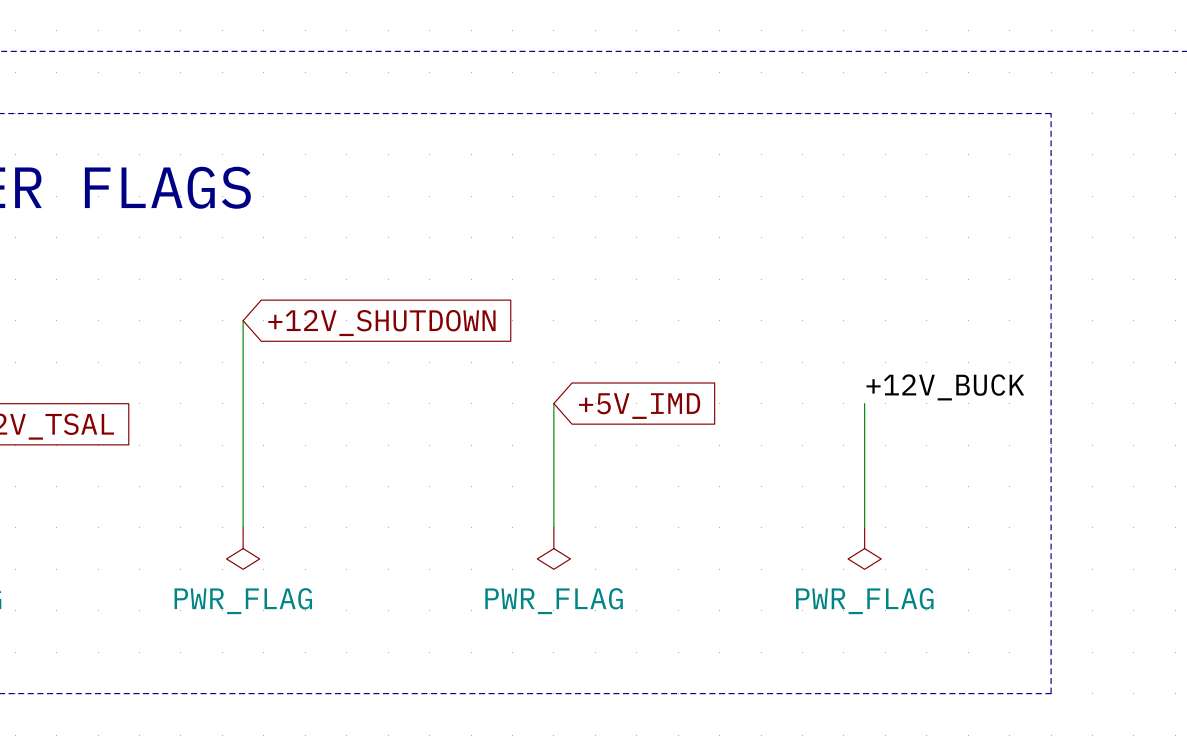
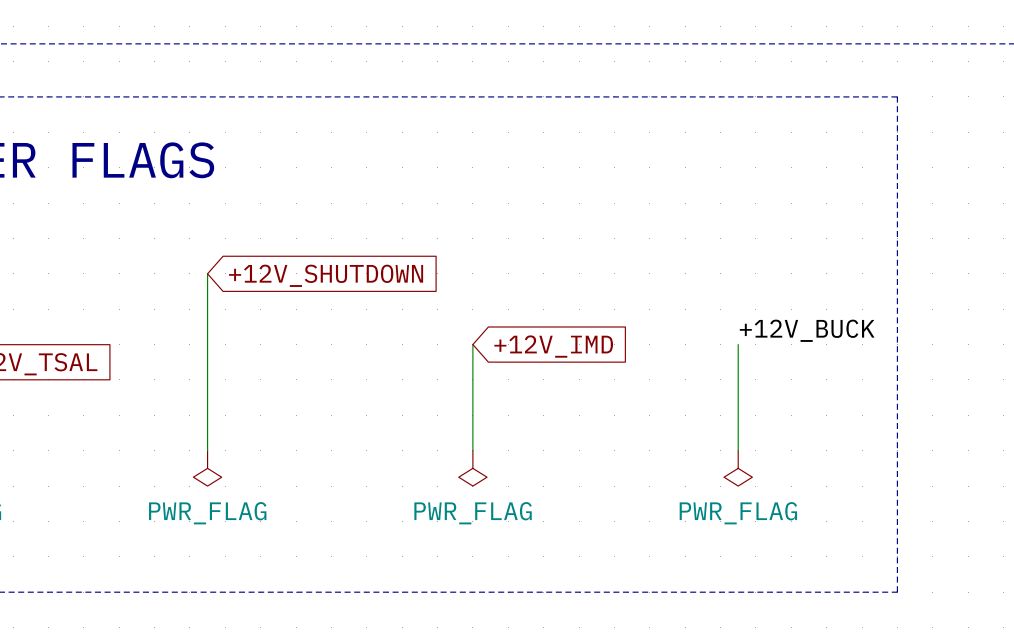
global label: +5V_IMD (639, 406) -> +12V_IMD (553, 346)

